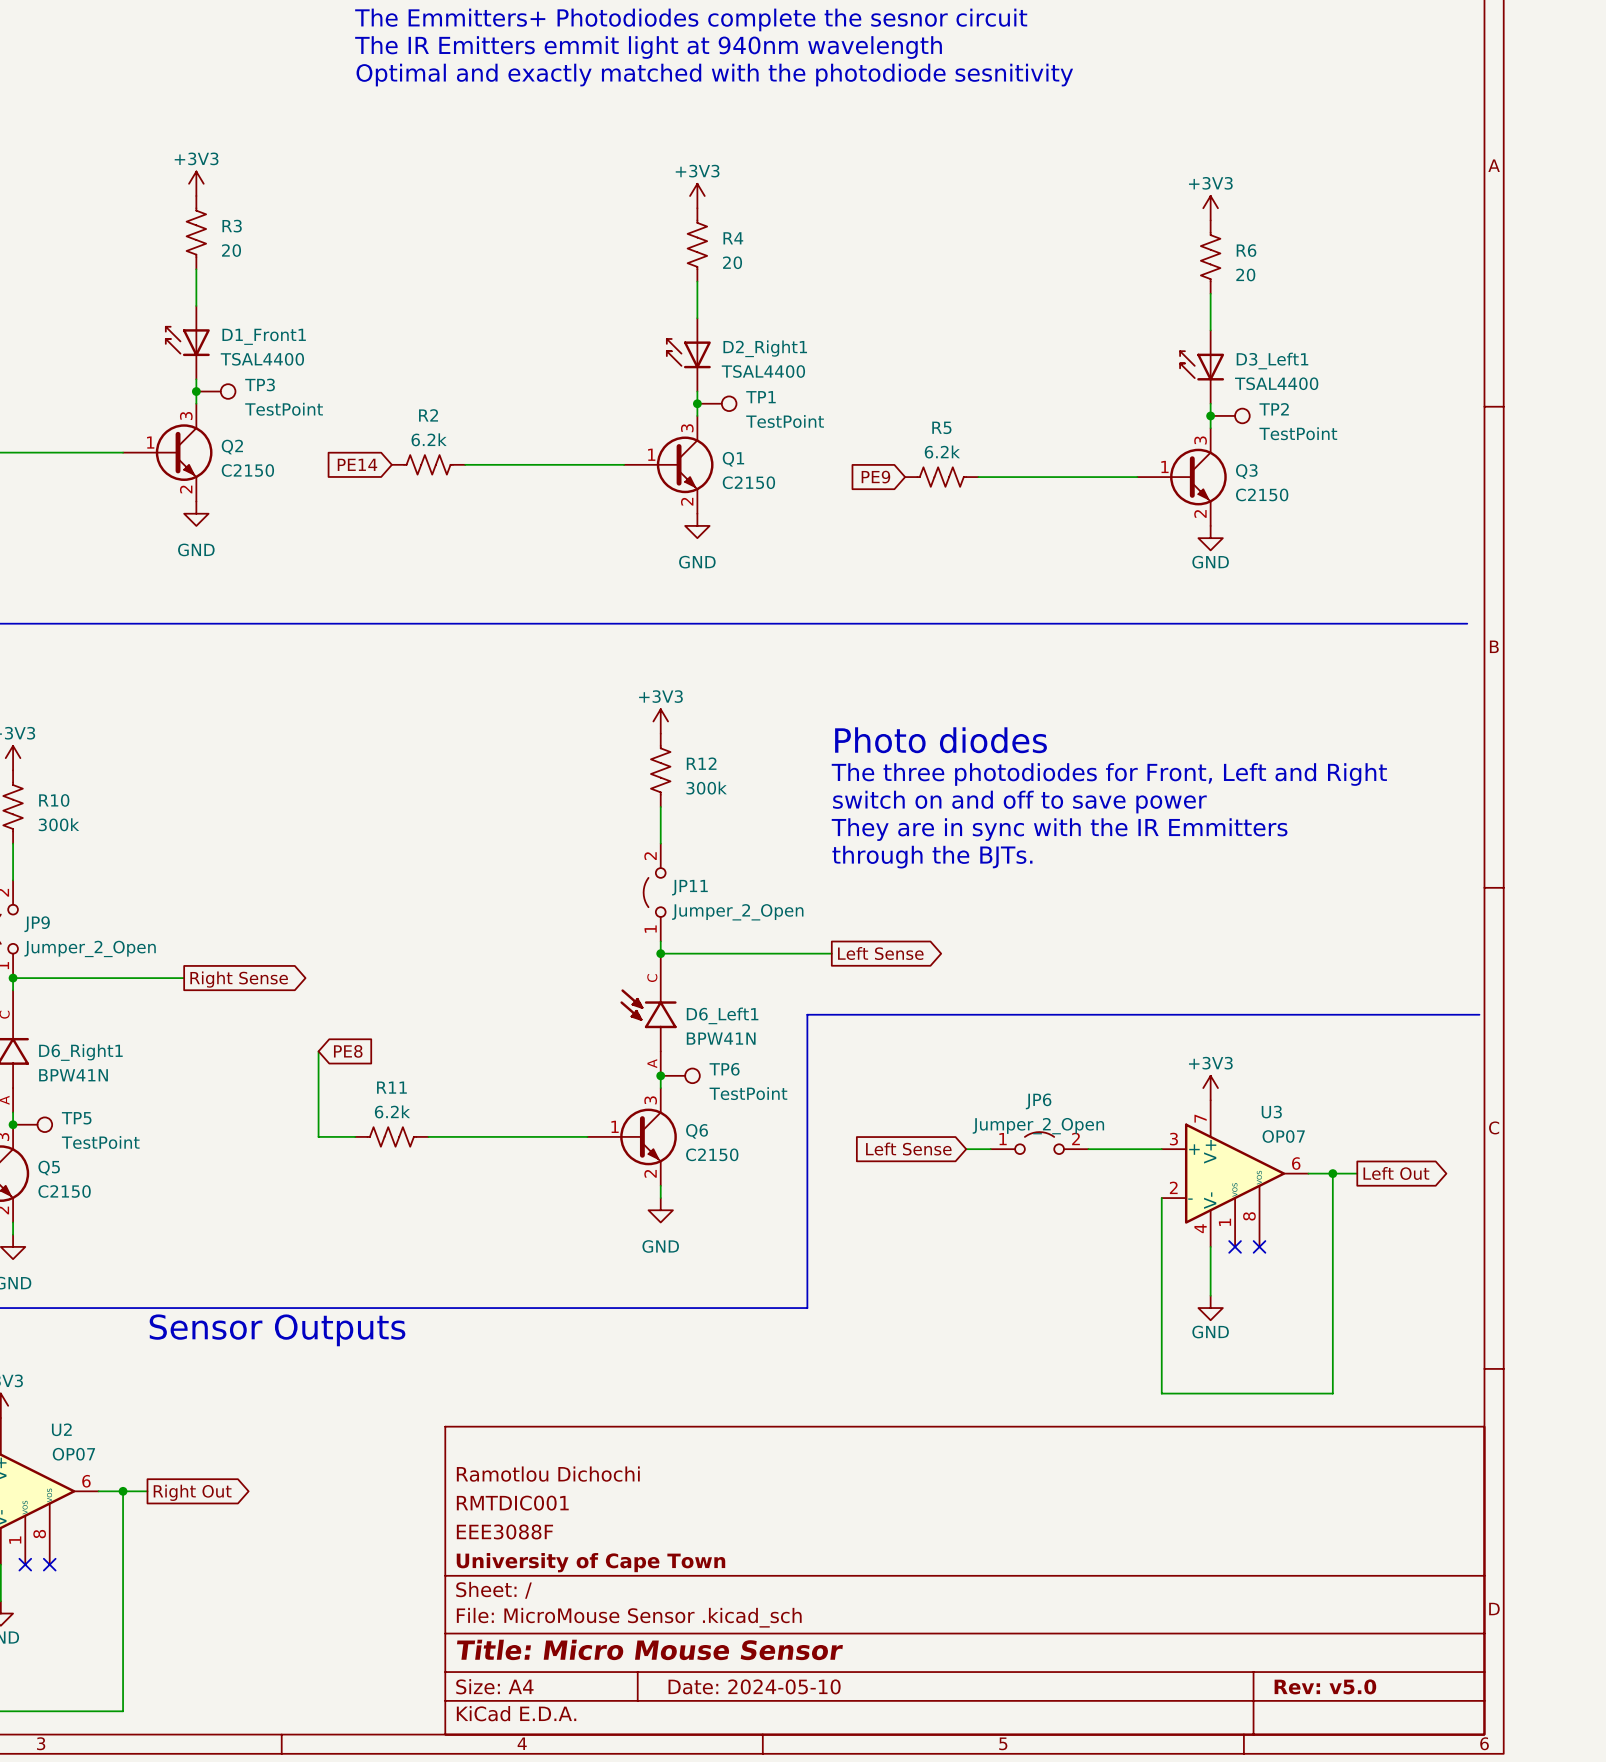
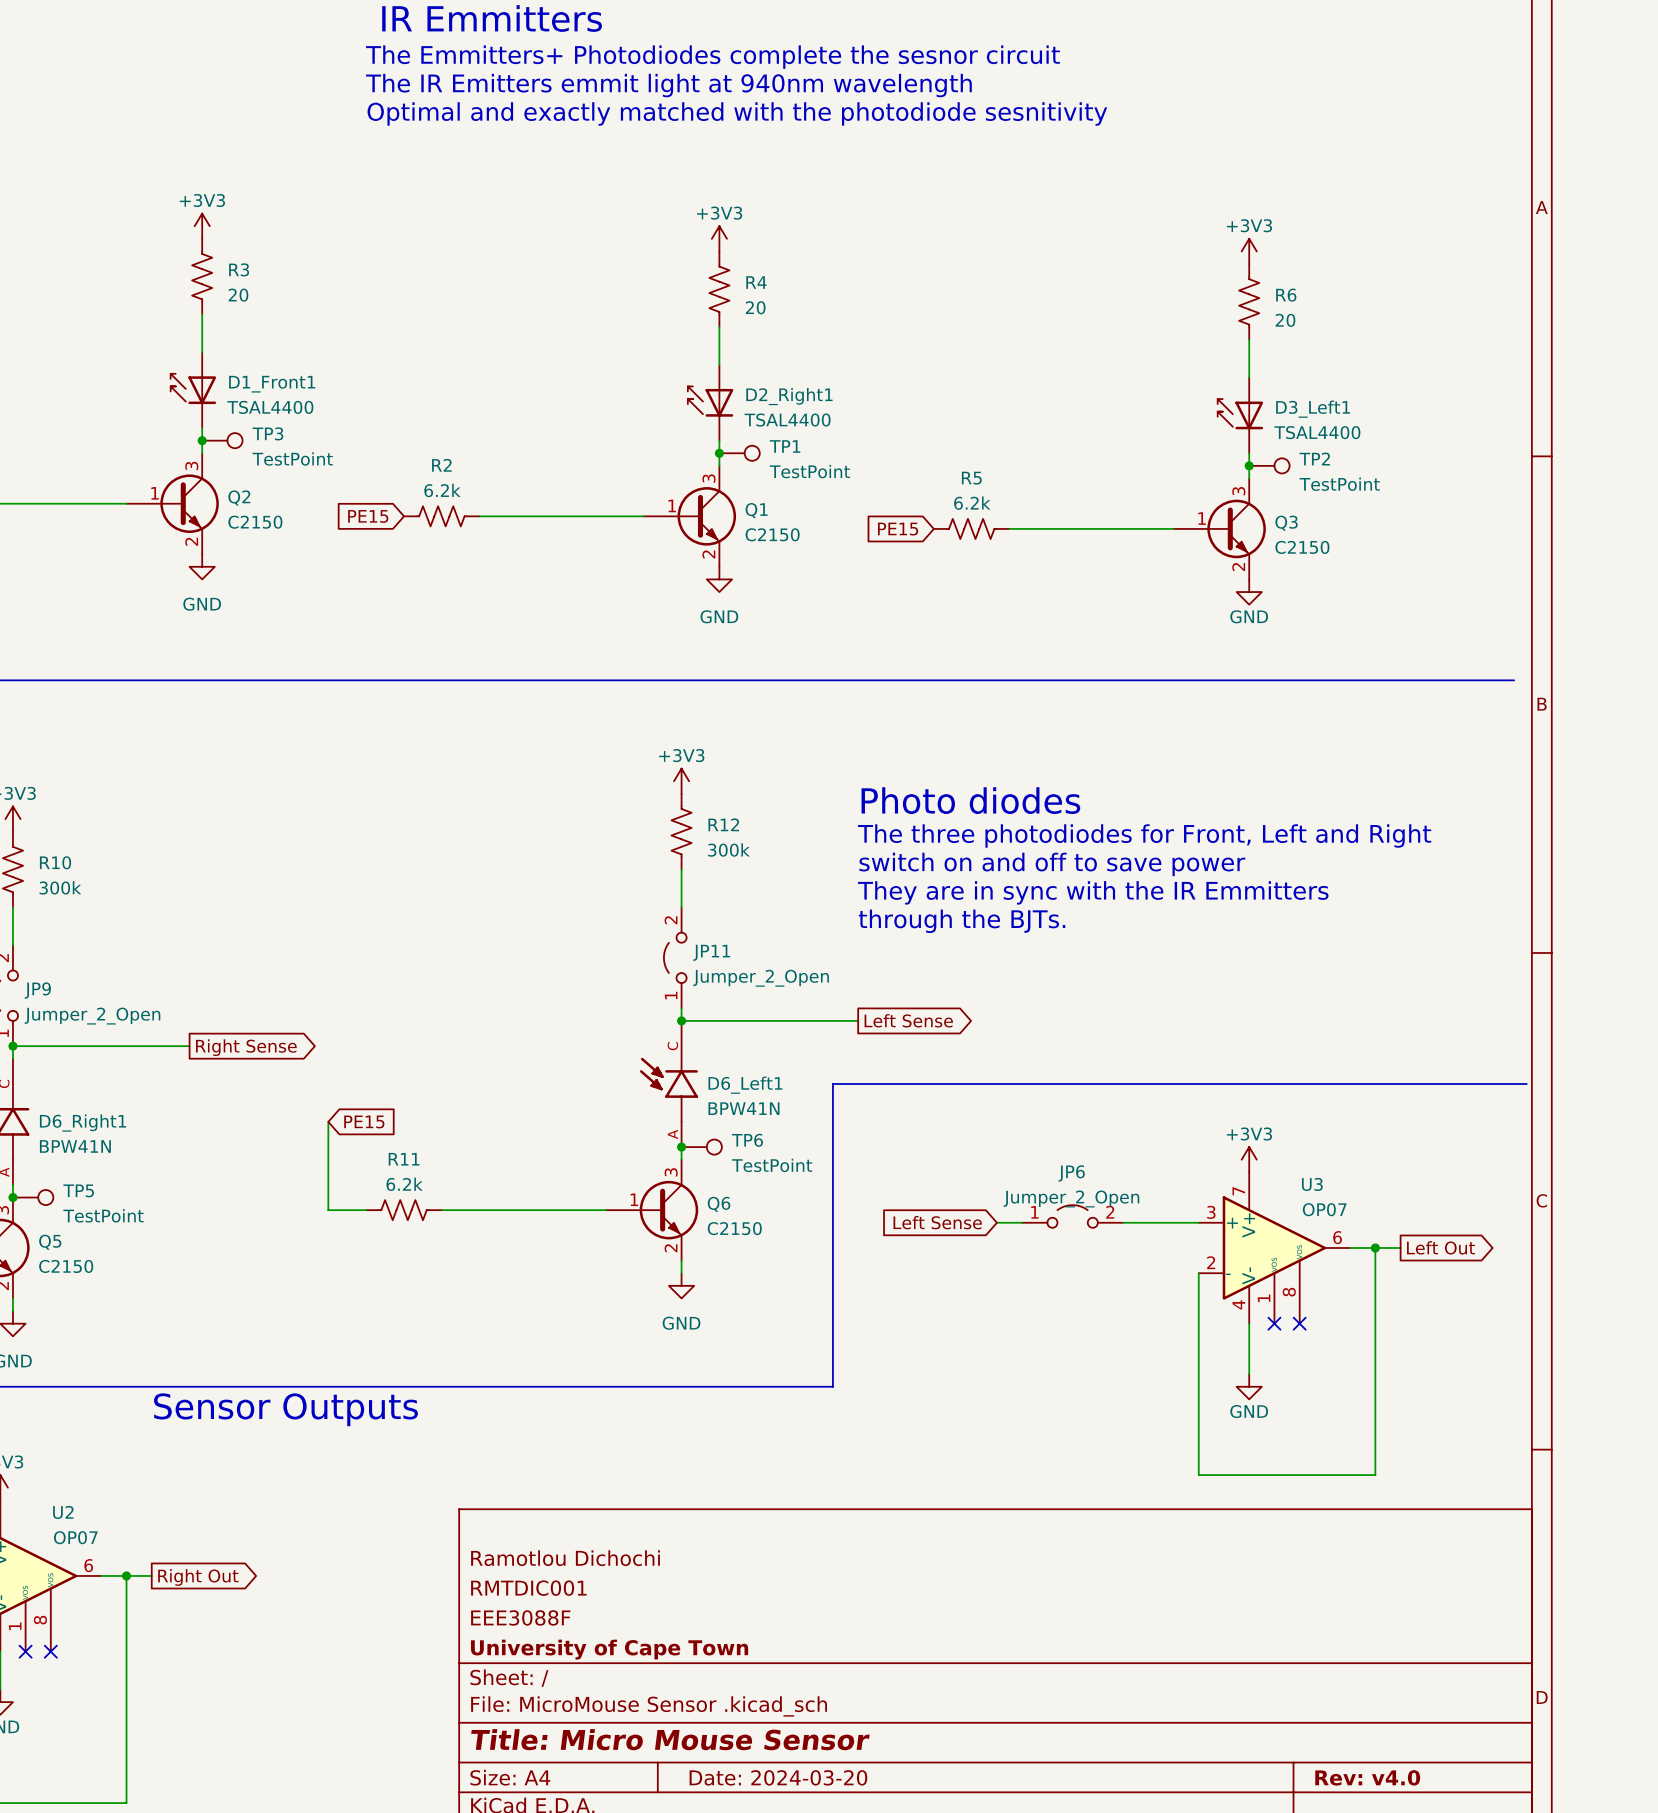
global label: PE14 (357, 464) -> PE15 (368, 516)
global label: PE9 (875, 477) -> PE15 (898, 529)
global label: PE8 (348, 1051) -> PE15 (364, 1121)
title block: Date: 2024-05-10 (754, 1686) -> Date: 2024-03-20 (778, 1777)
title block: Rev: v5.0 (1325, 1686) -> Rev: v4.0 (1367, 1777)

